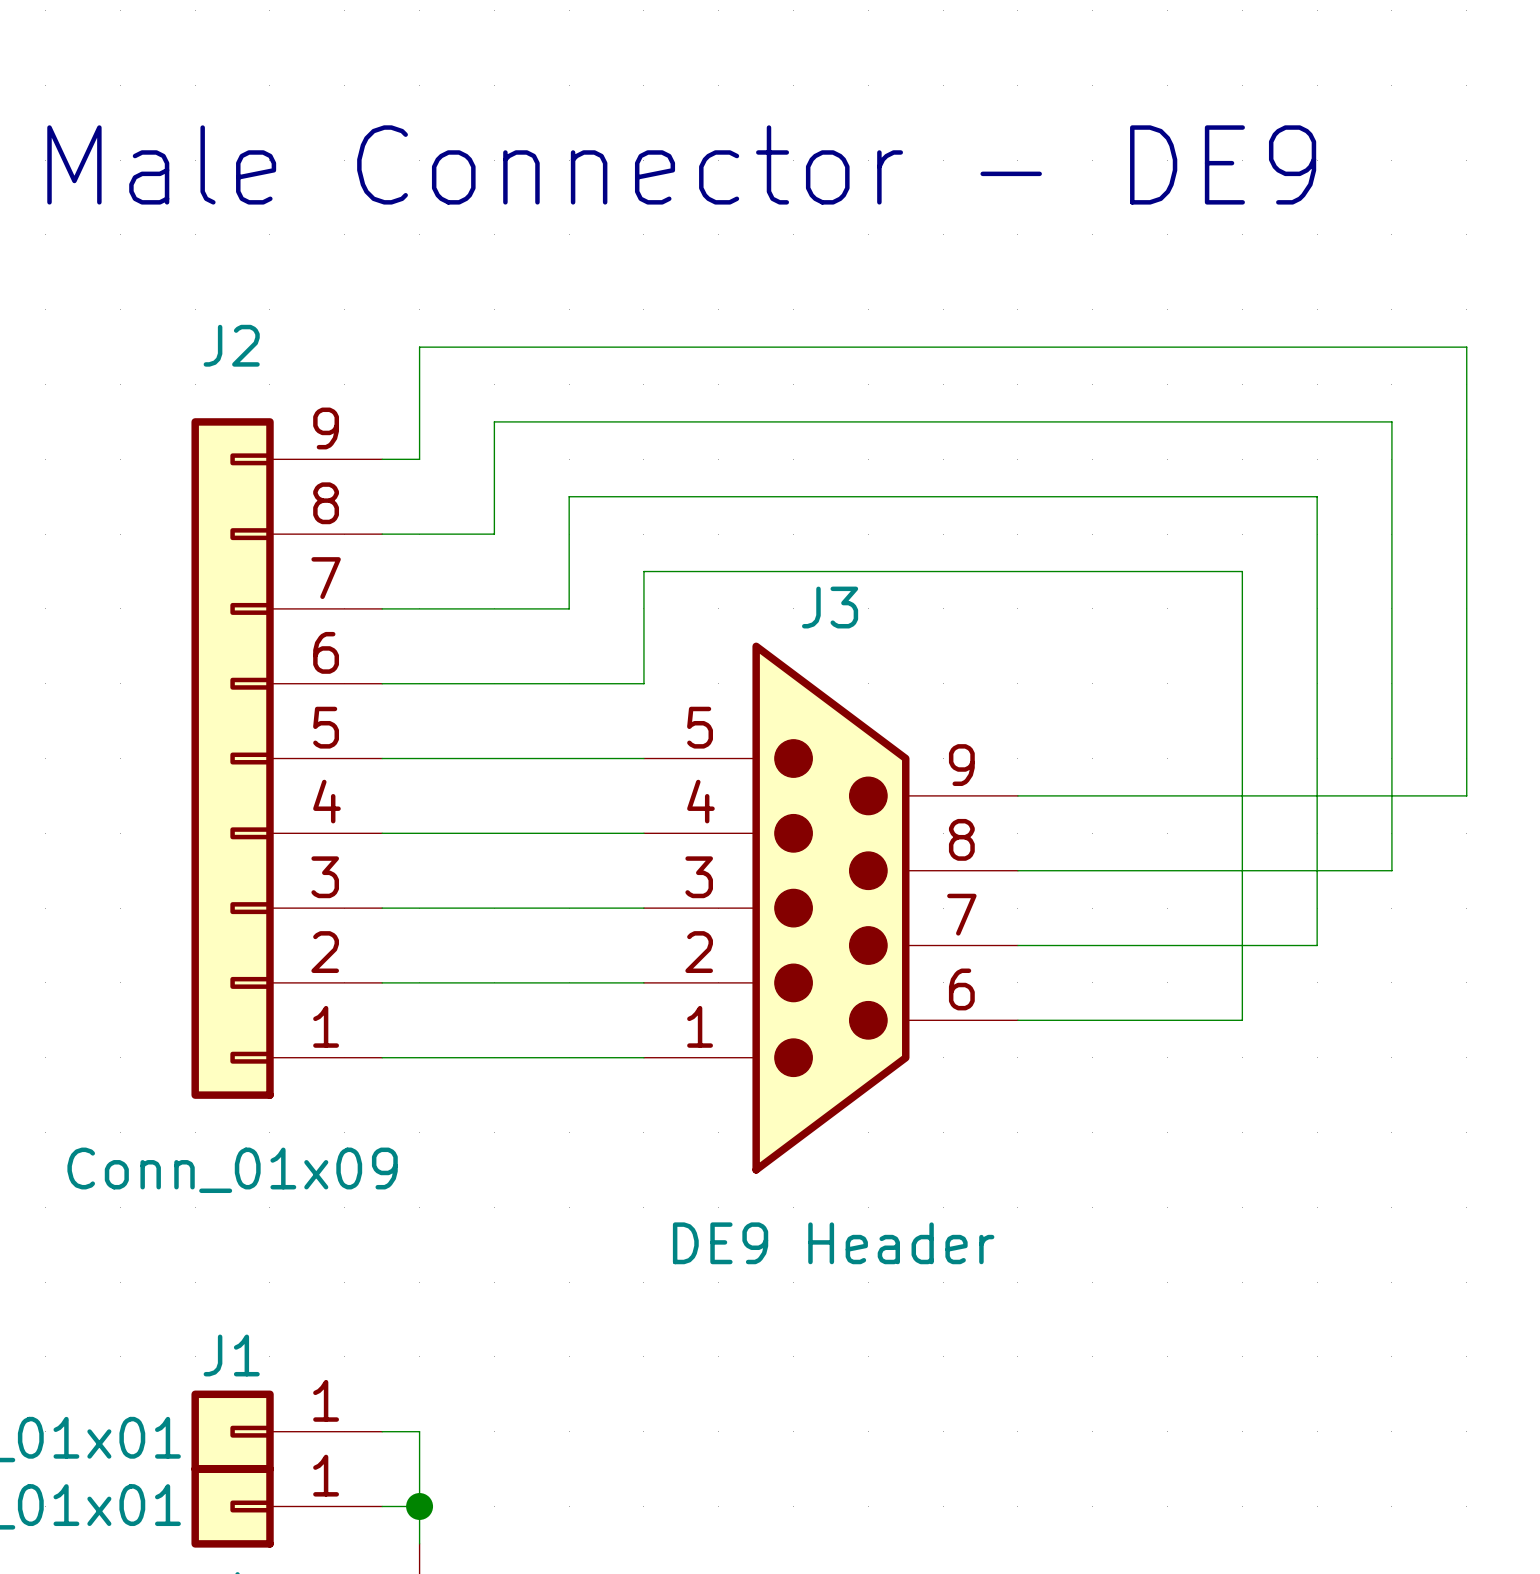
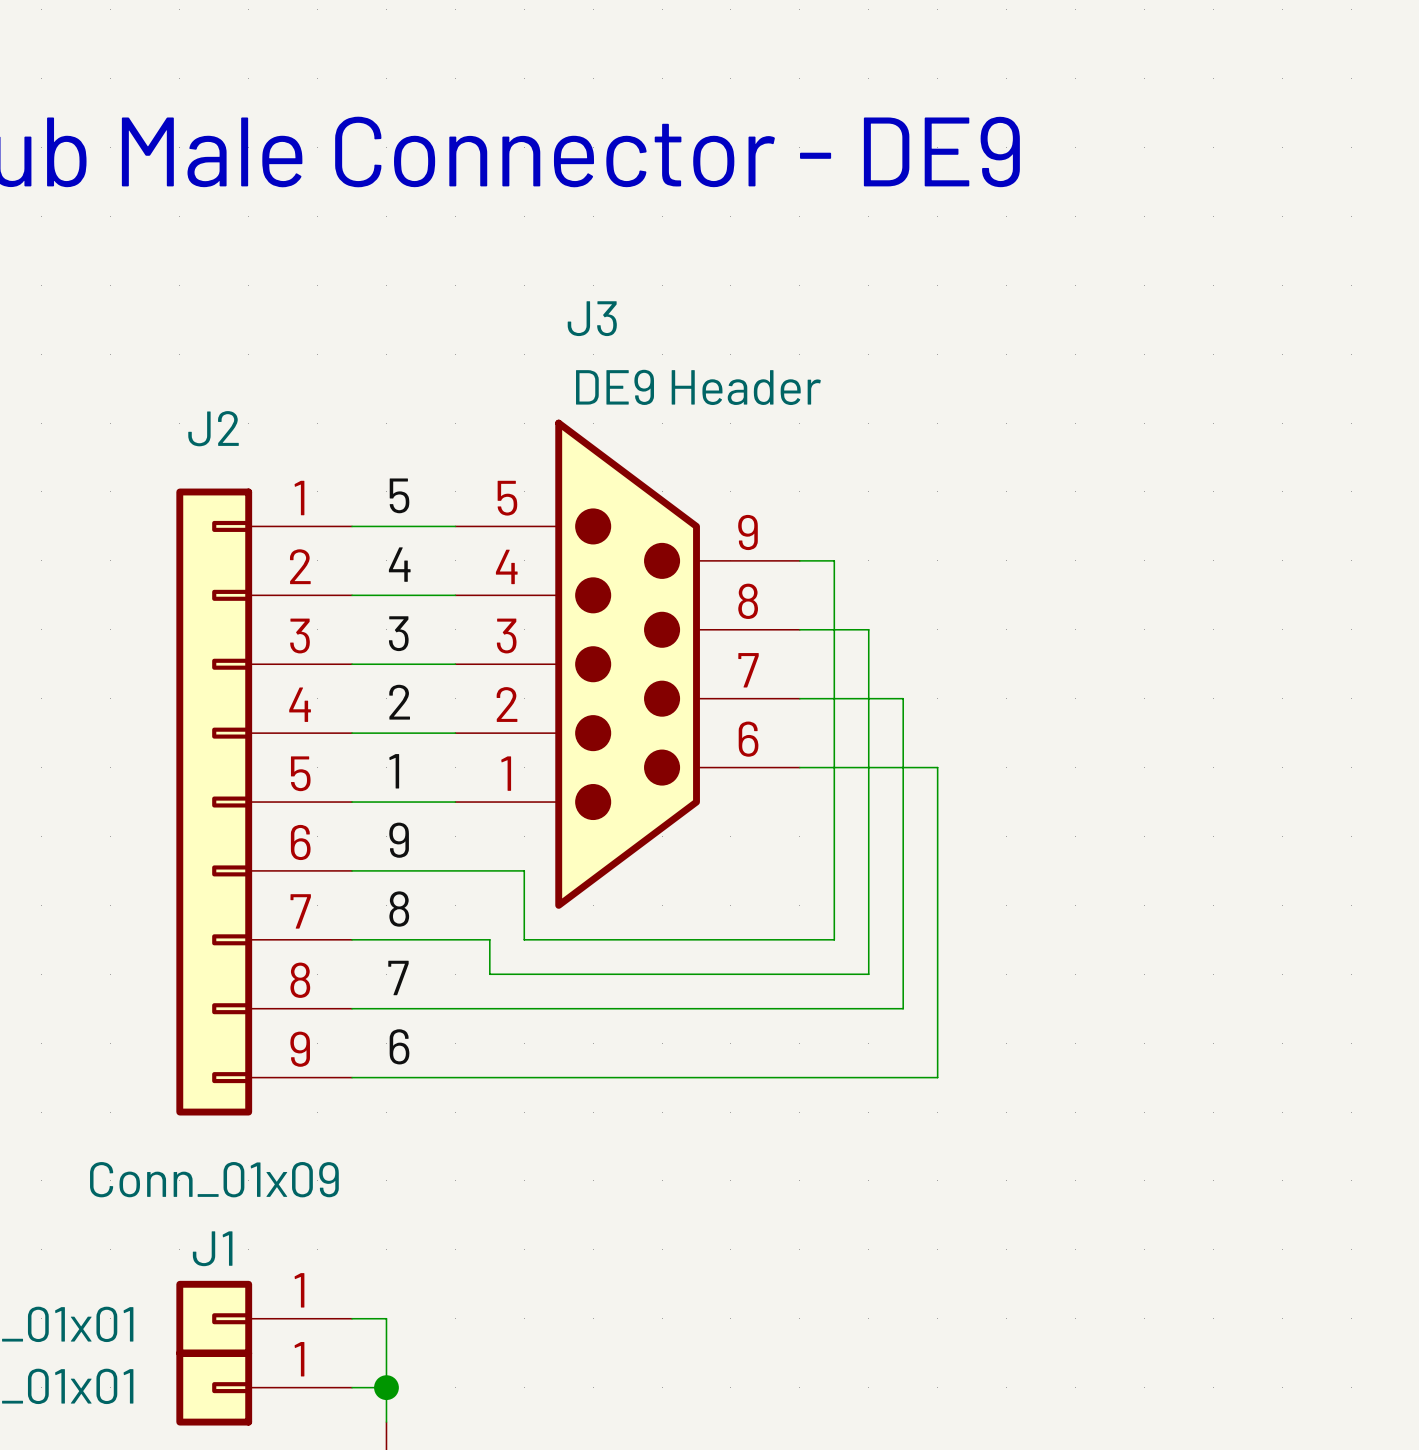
wire: (382, 459) (419, 459) (419, 347) (1466, 347) (1466, 795) (1017, 795) -> none
wire: (382, 534) (494, 534) (494, 421) (1391, 421) (1391, 870) (1017, 870) -> none
label: none -> 5 (399, 495)
wire: none -> (352, 526) (455, 526)
J3 name position: J3 (830, 607) -> J3 (592, 318)
wire: (382, 608) (569, 608) (569, 496) (1317, 496) (1317, 945) (1017, 945) -> none
wire: none -> (799, 560) (834, 560) (834, 939) (524, 939) (524, 870) (352, 870)
label: none -> 4 (399, 564)
wire: none -> (352, 595) (455, 595)
wire: (382, 683) (643, 683) (643, 571) (1242, 571) (1242, 1020) (1017, 1020) -> none
wire: none -> (799, 629) (868, 629) (868, 974) (593, 974)
label: none -> 3 (398, 633)
wire: none -> (352, 664) (455, 664)
J2 flip: as is (232, 758) -> up-down (214, 802)
wire: (382, 758) (643, 758) -> none
wire: none -> (799, 698) (903, 698) (903, 1008) (352, 1008)
label: none -> 2 (399, 702)
wire: none -> (352, 733) (455, 733)
wire: (382, 833) (643, 833) -> none
wire: none -> (799, 767) (937, 767) (937, 1077) (352, 1077)
label: none -> 1 (394, 771)
wire: none -> (352, 802) (455, 802)
wire: (382, 908) (643, 908) -> none
J3 position: (830, 908) -> (627, 664)
label: none -> 9 (399, 840)
wire: (382, 982) (643, 982) -> none
label: none -> 8 (399, 909)
wire: (382, 1057) (531, 1057) -> (352, 939) (489, 939) (489, 974)
label: none -> 7 (398, 977)
label: none -> 6 (399, 1046)
J3 value position: DE9 Header (833, 1243) -> DE9 Header (698, 387)

